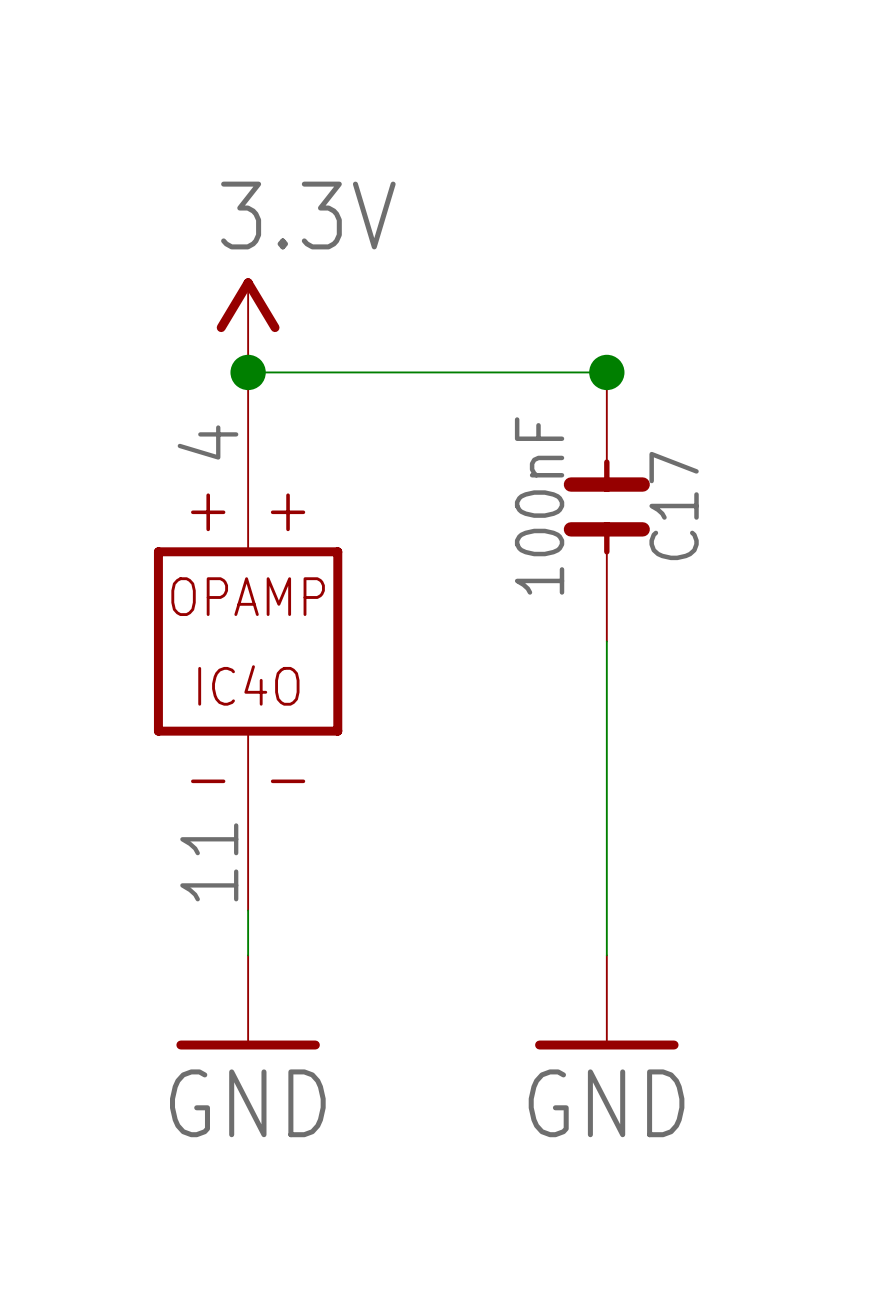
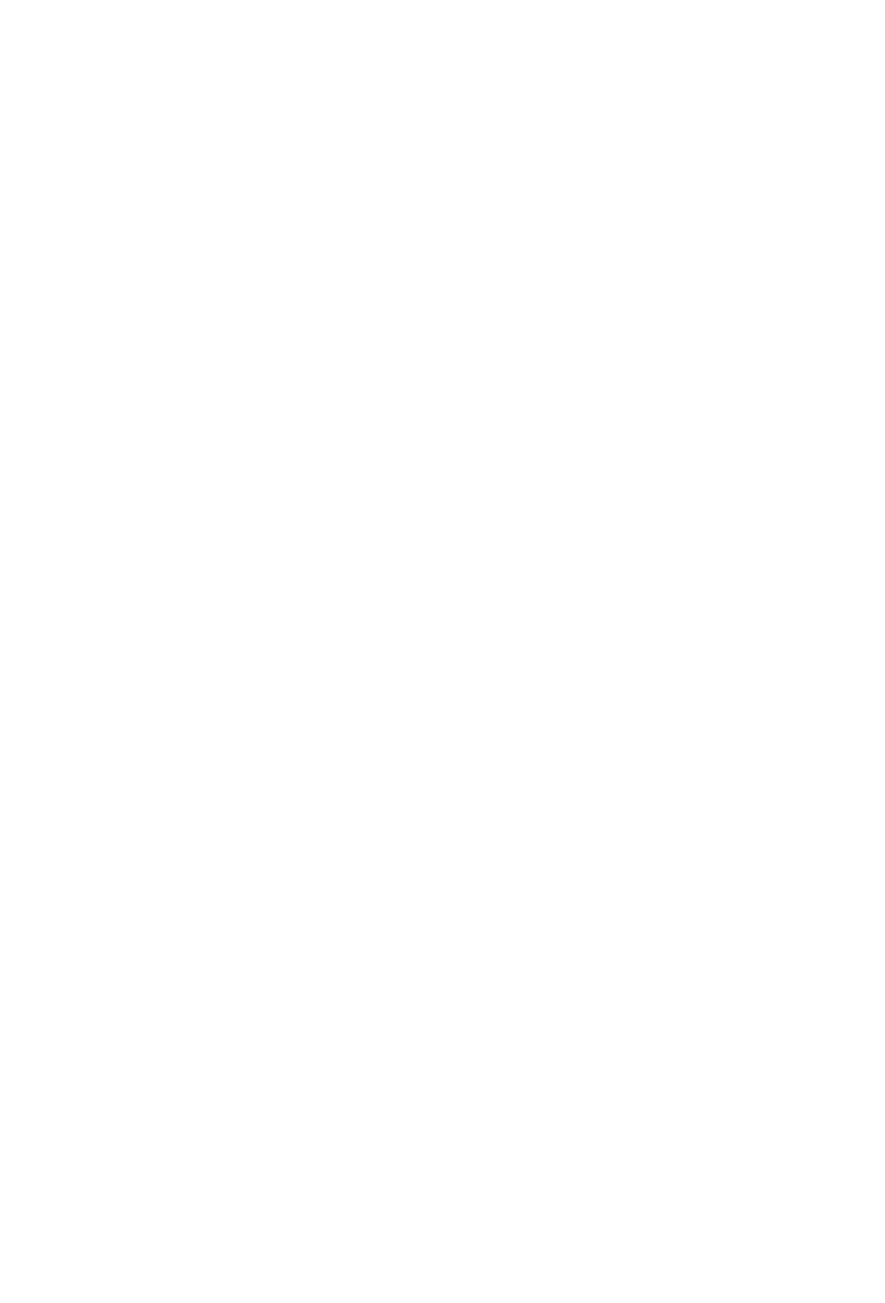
power symbol: 3.3V (248, 325) -> none
wire: (248, 372) (606, 372) -> none
junction: (248, 372) -> none
junction: (606, 372) -> none
C17: 100nF (606, 506) -> none
IC4O: (248, 641) -> none
wire: (606, 641) (606, 955) -> none
wire: (248, 910) (248, 955) -> none
power symbol: GND (248, 1002) -> none
power symbol: GND (606, 1002) -> none

